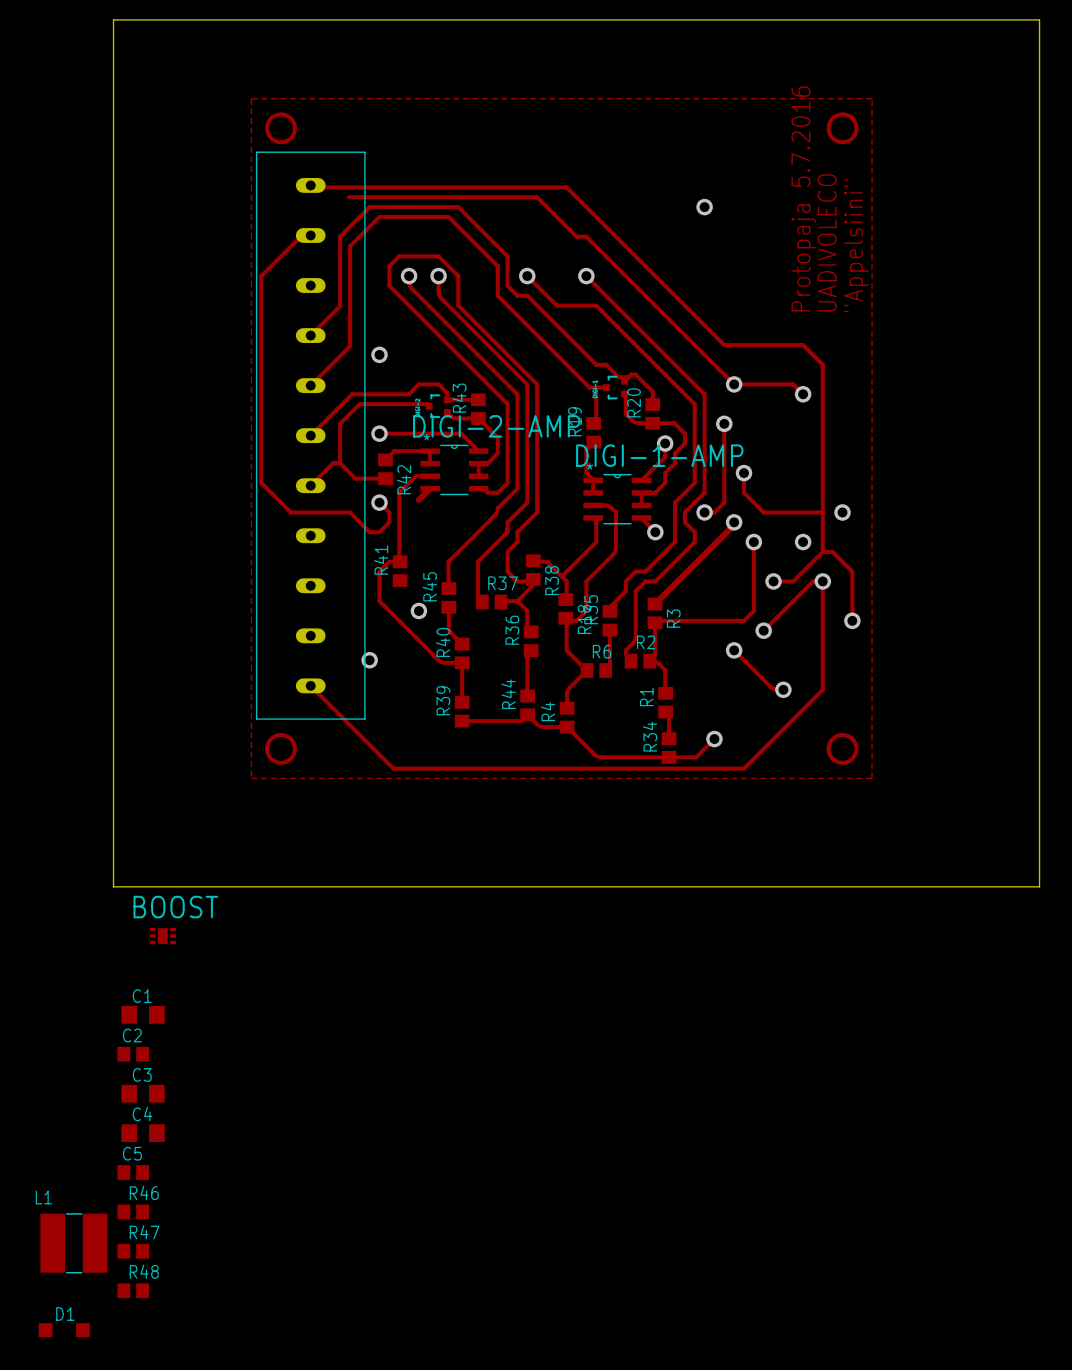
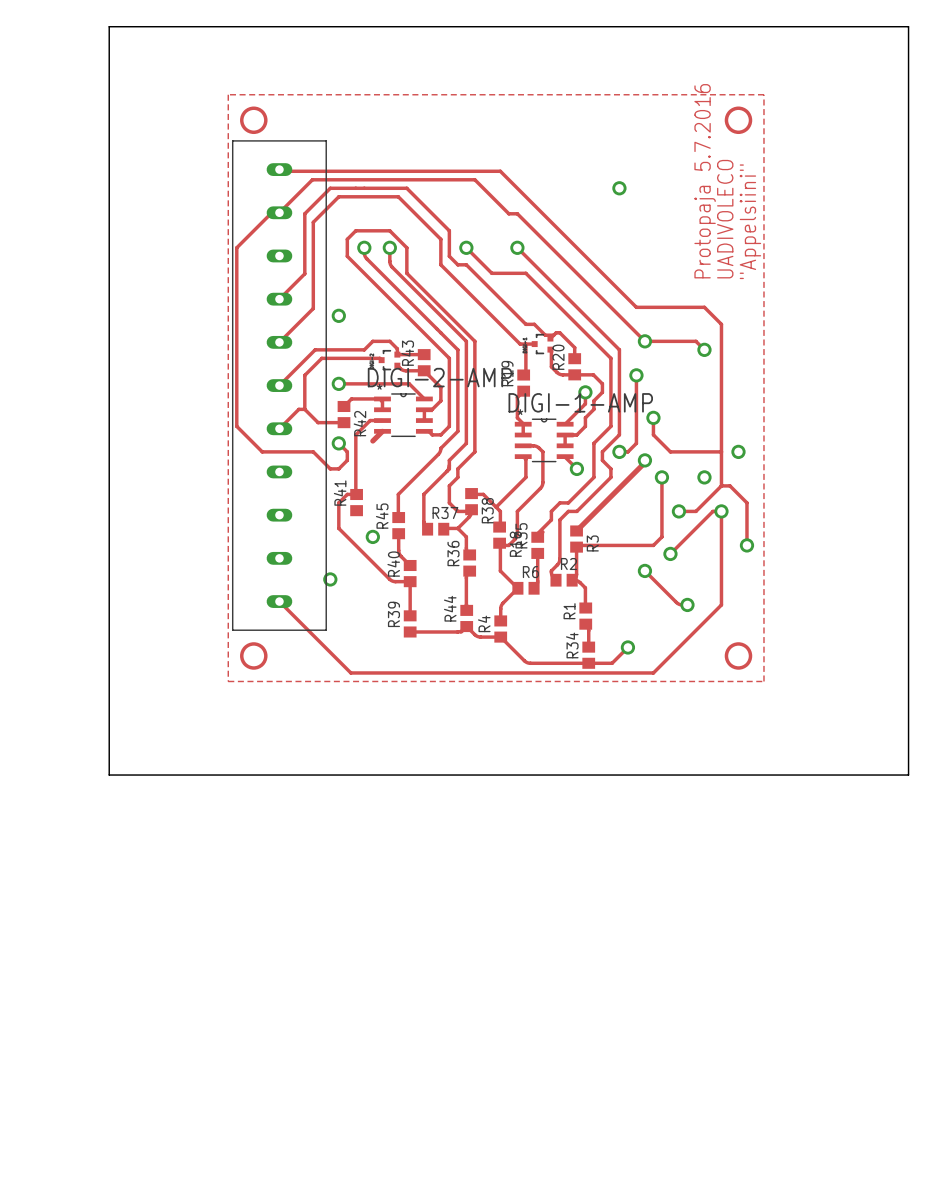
track: none -> (312, 179) (279, 212) (271, 212)
BOOST: (162, 936) -> none
C1: (143, 1014) -> none
C2: (133, 1054) -> none
C3: (143, 1093) -> none
C4: (143, 1133) -> none
C5: (133, 1172) -> none
R46: (133, 1211) -> none
L1: (73, 1243) -> none
R47: (133, 1251) -> none
R48: (133, 1290) -> none
D1: (64, 1330) -> none

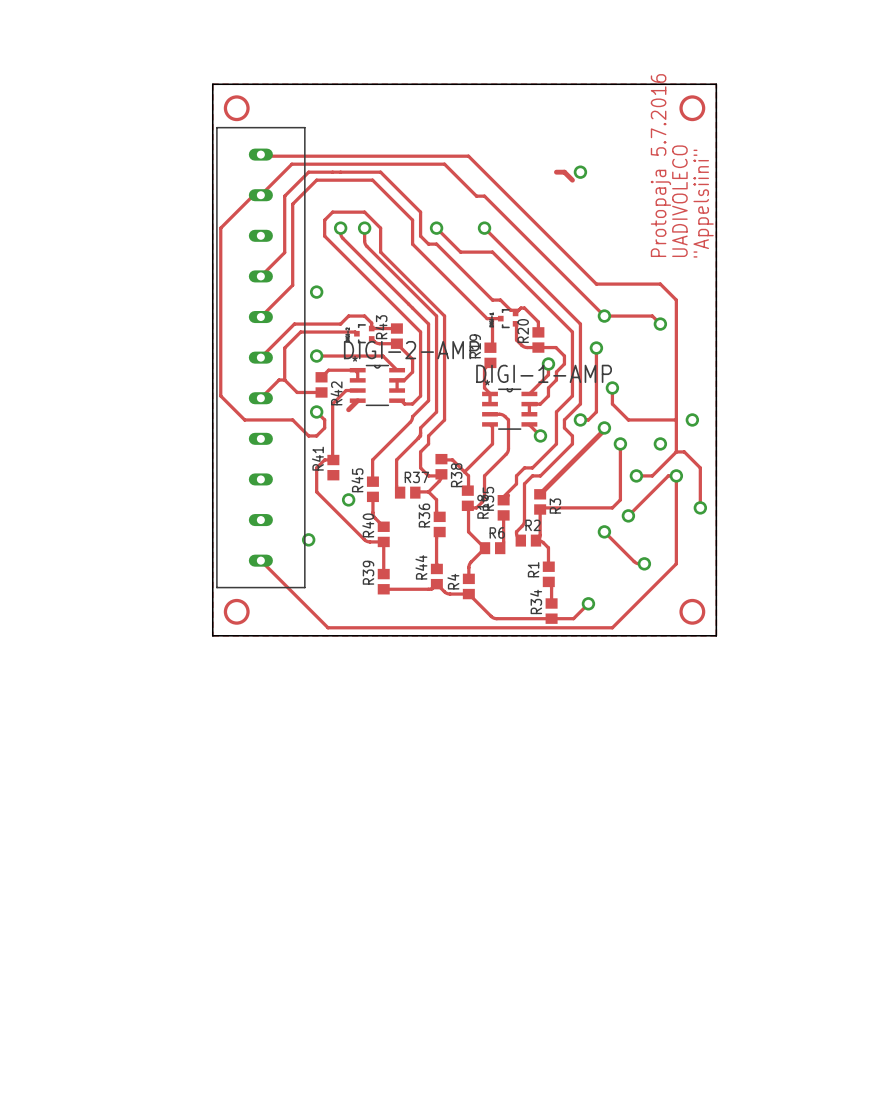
board edge: (109, 26) (908, 26) (908, 775) (109, 775) (109, 26) -> (212, 84) (212, 635) (716, 635) (716, 84) (212, 84)
track: none -> (556, 172) (564, 172) (572, 180)

